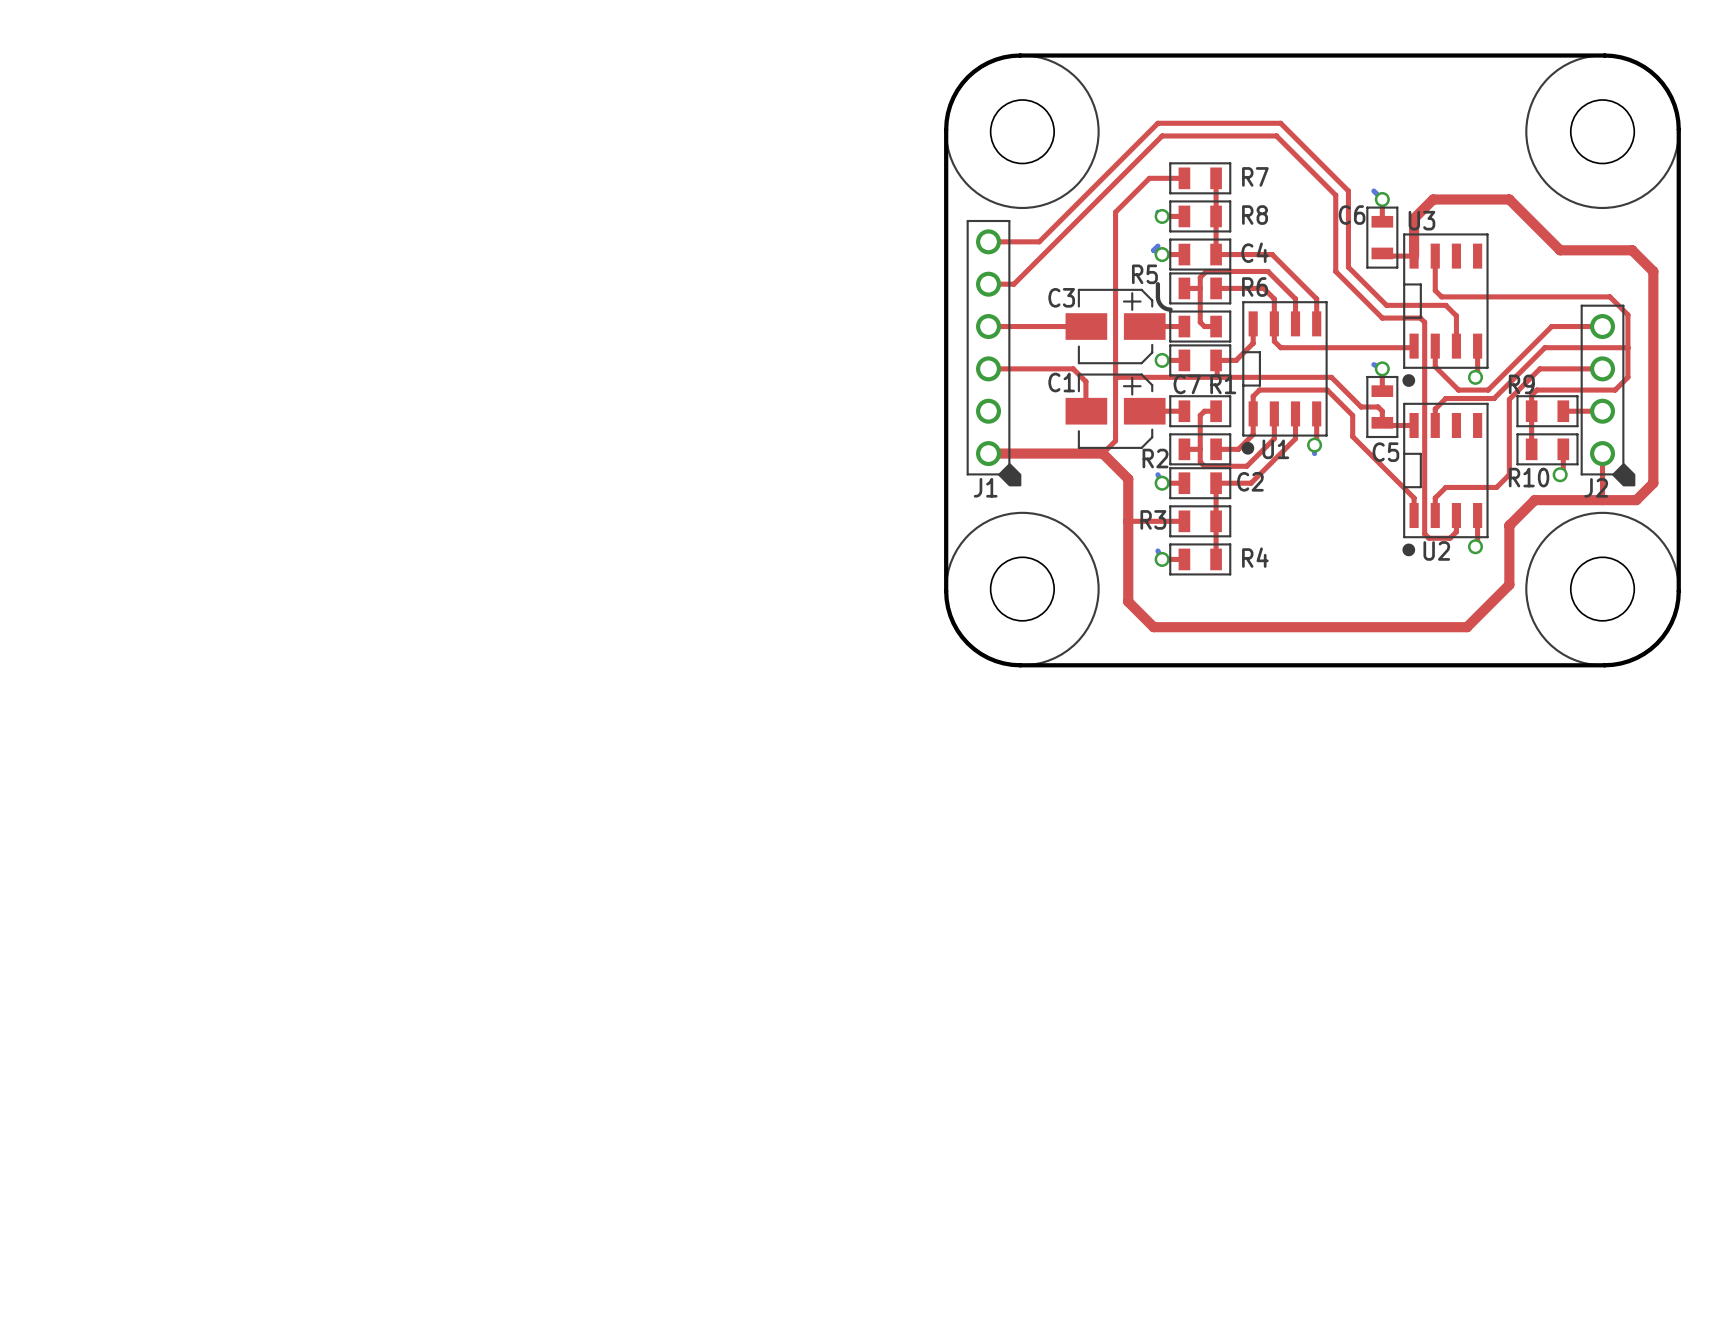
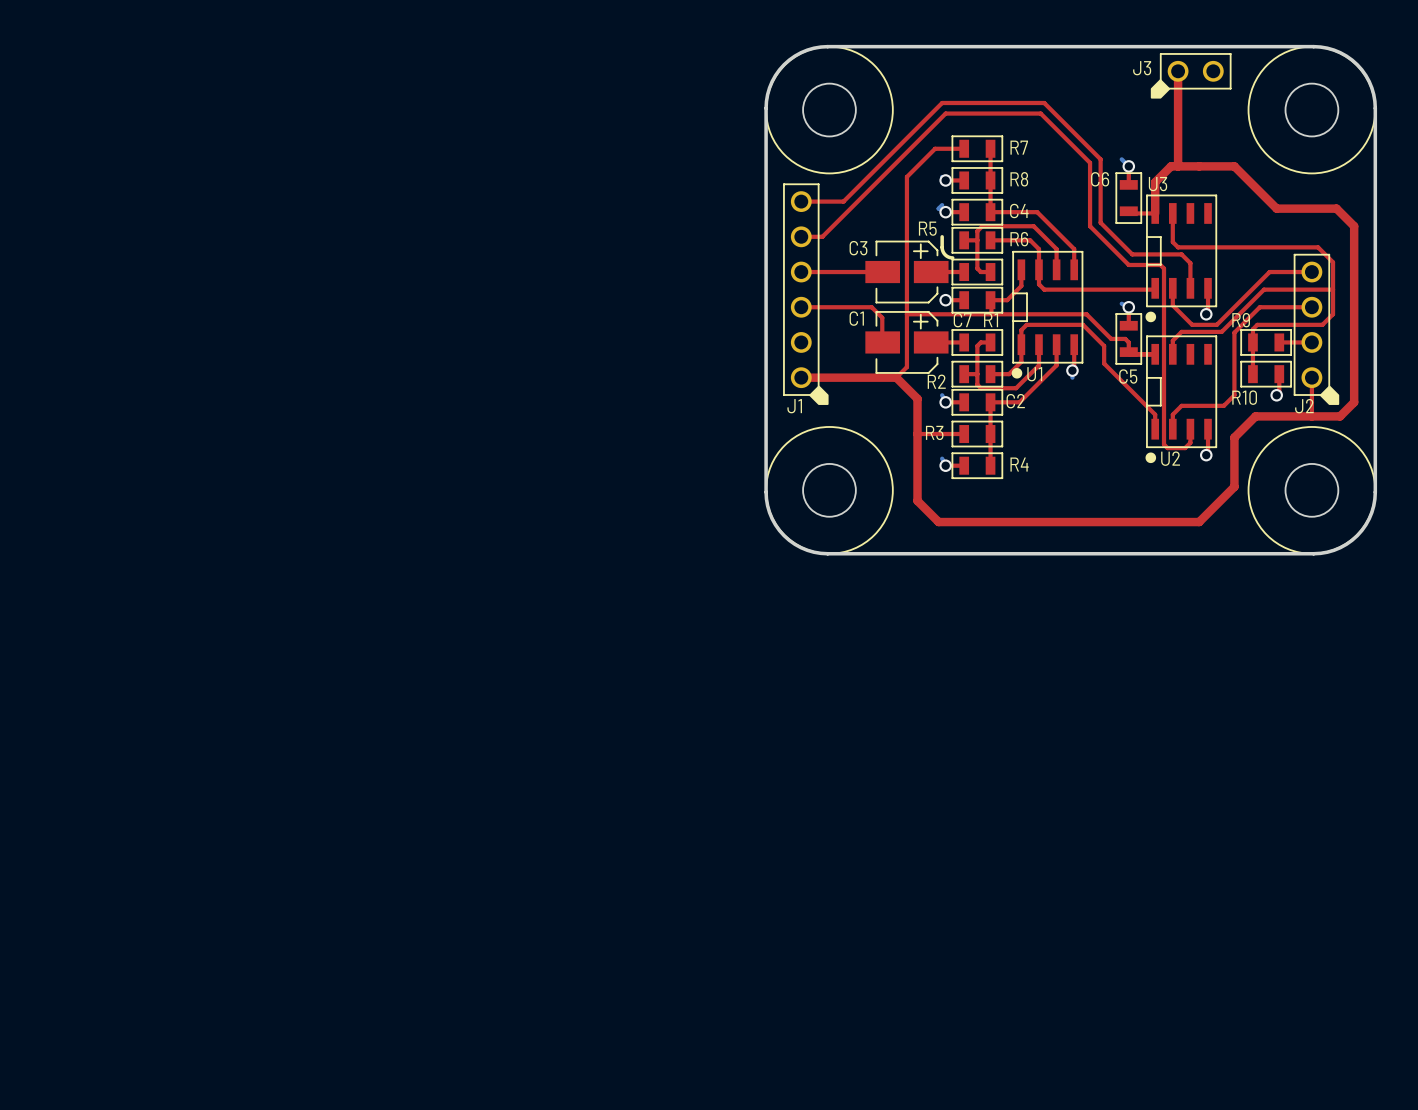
top track: none -> (1178, 71) (1178, 166)
J3: none -> (1191, 75)

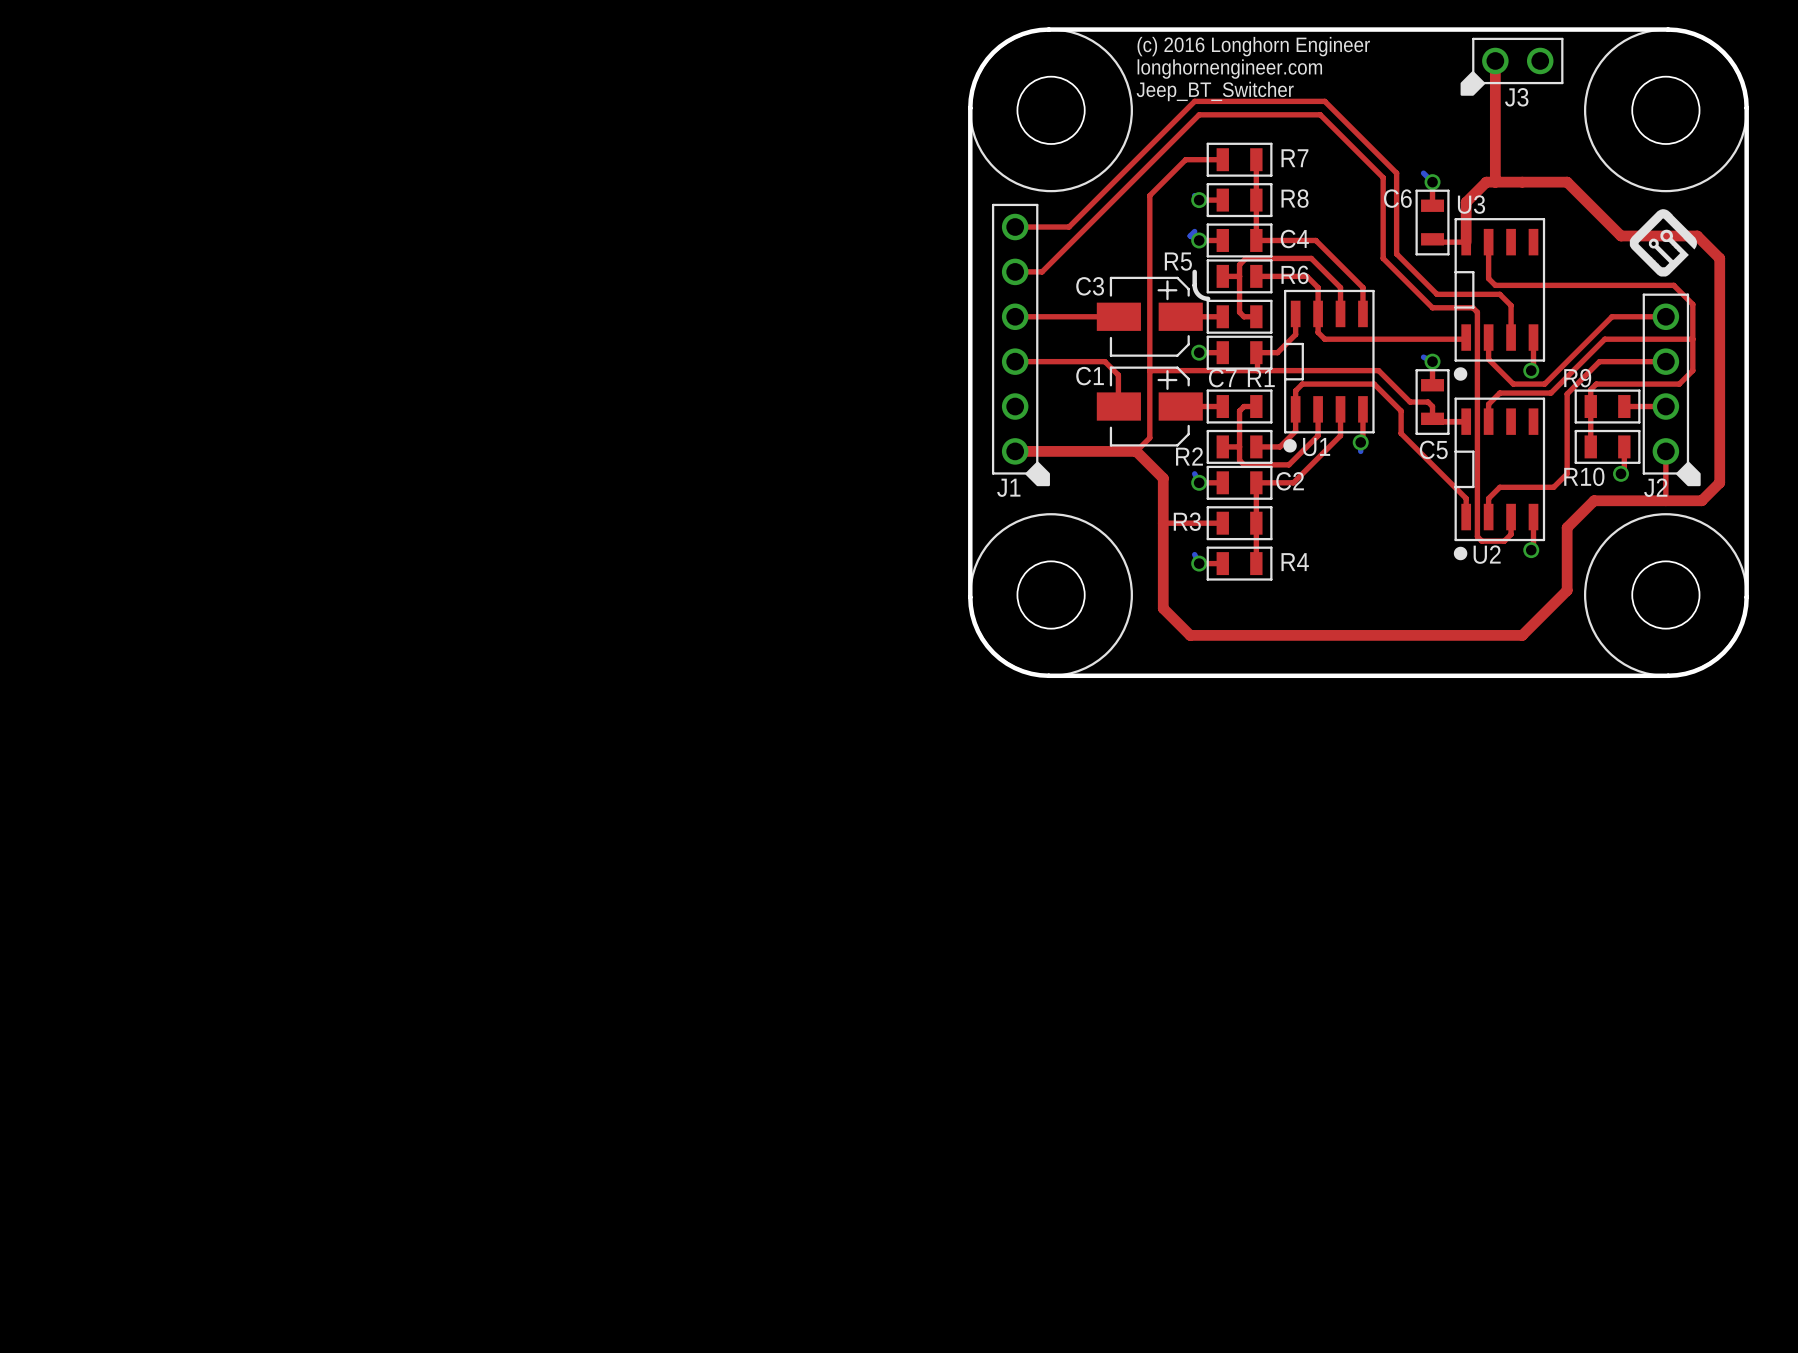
drawing: none -> [1136, 36, 1370, 102]
J3 name position: J3 (1142, 68) -> J3 (1516, 97)
drawing: none -> [1629, 209, 1697, 277]

